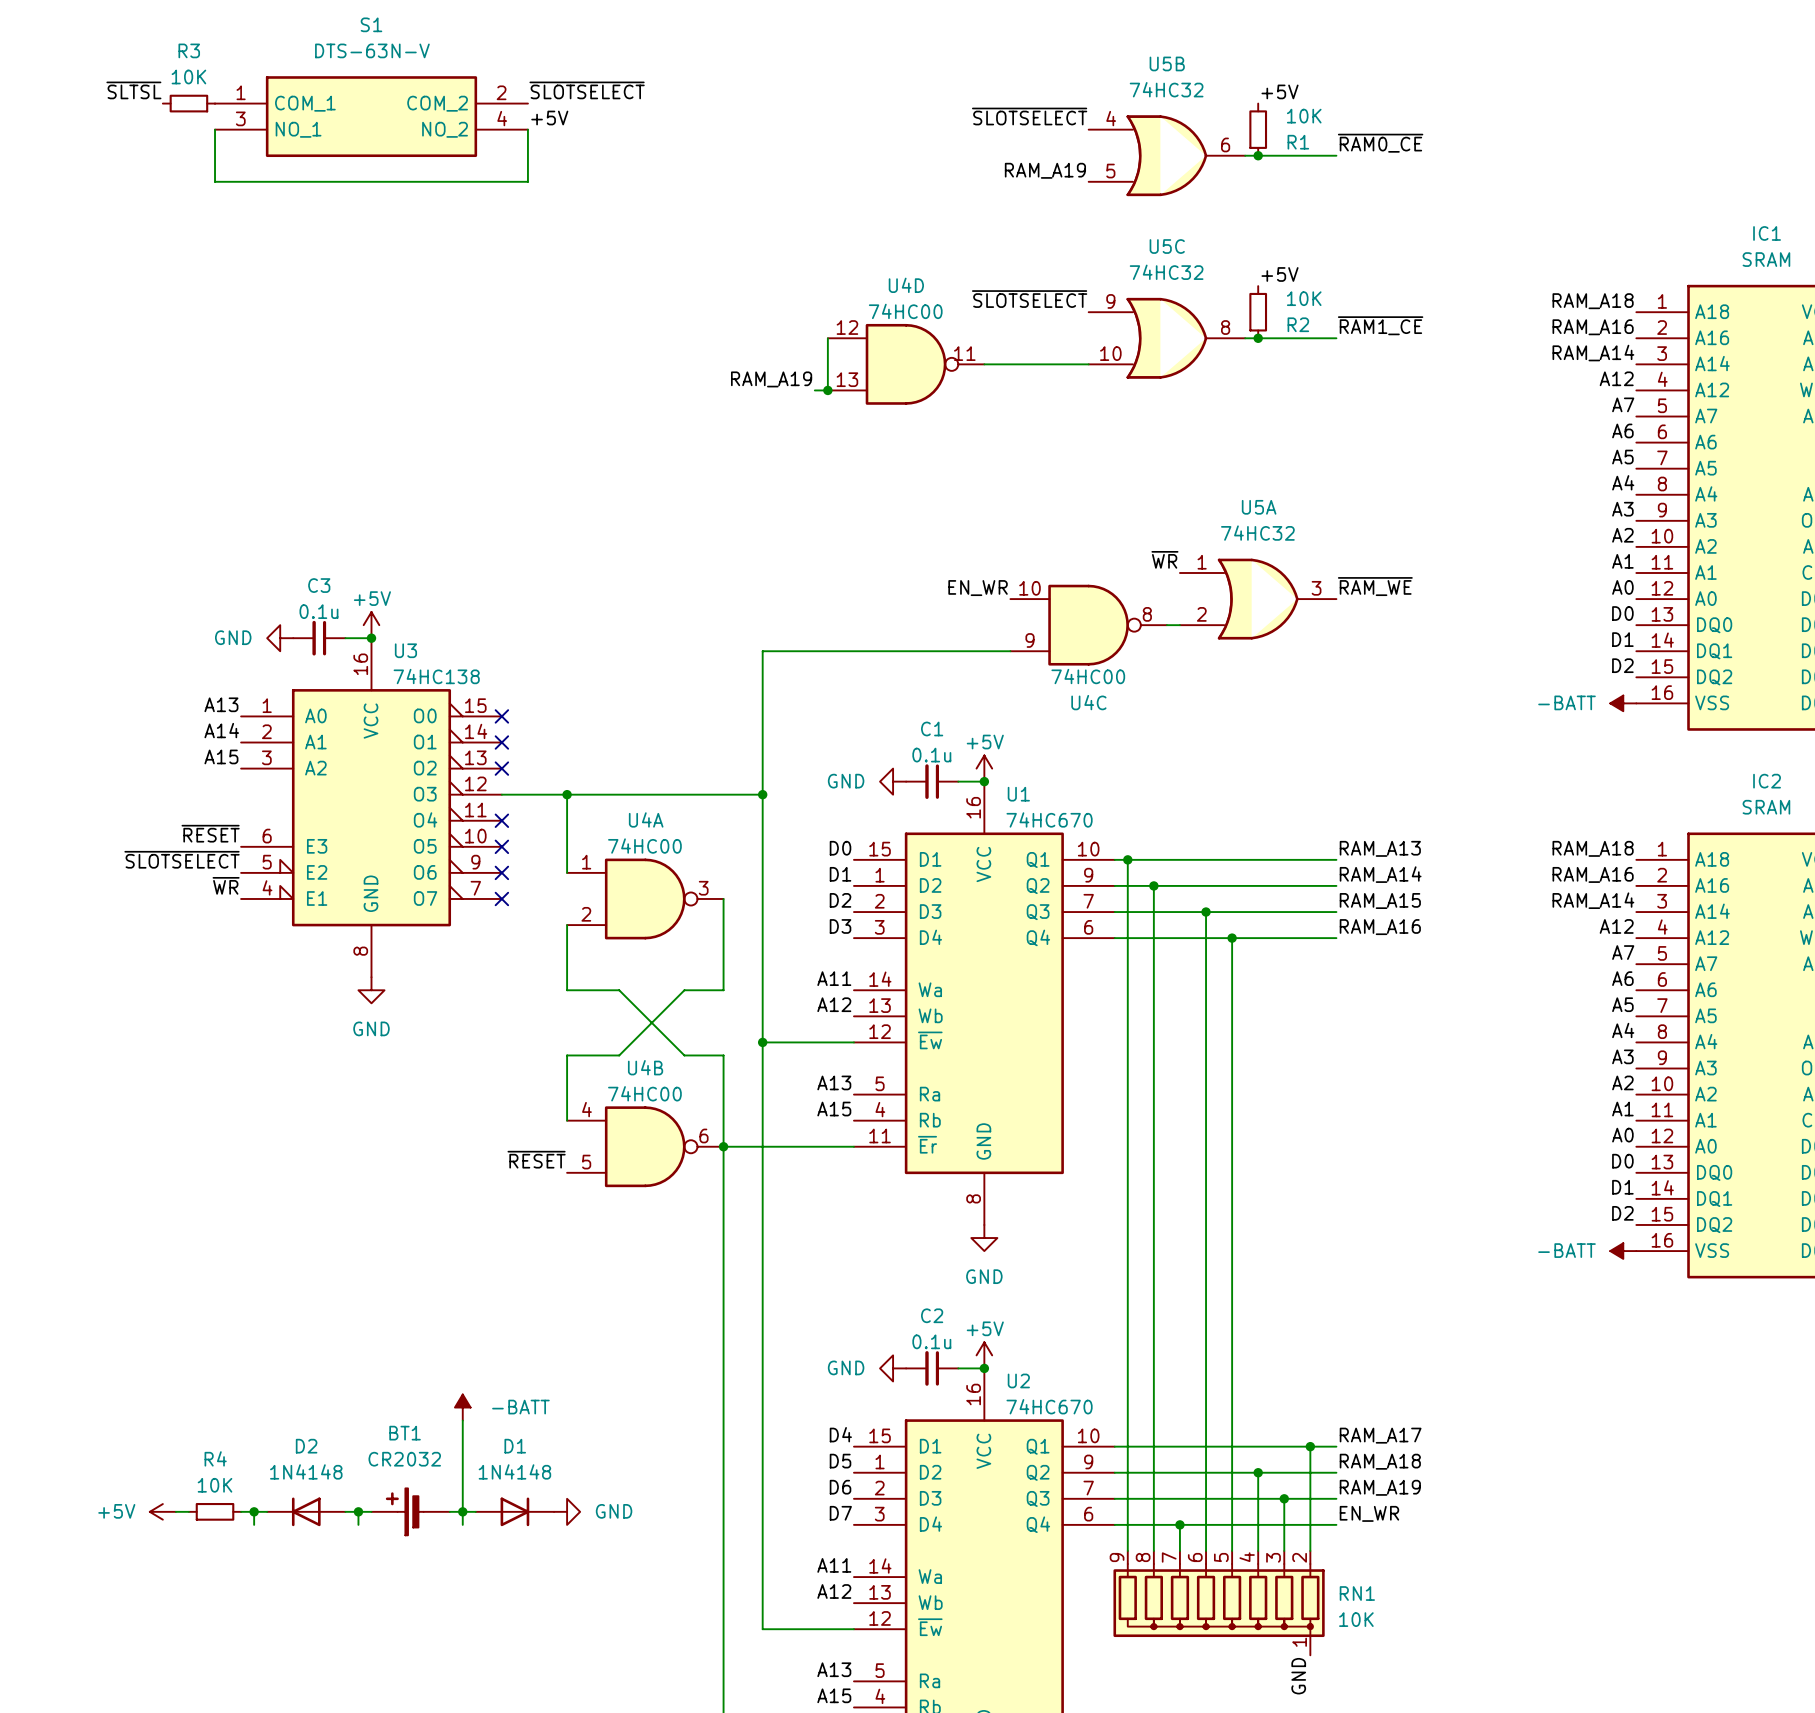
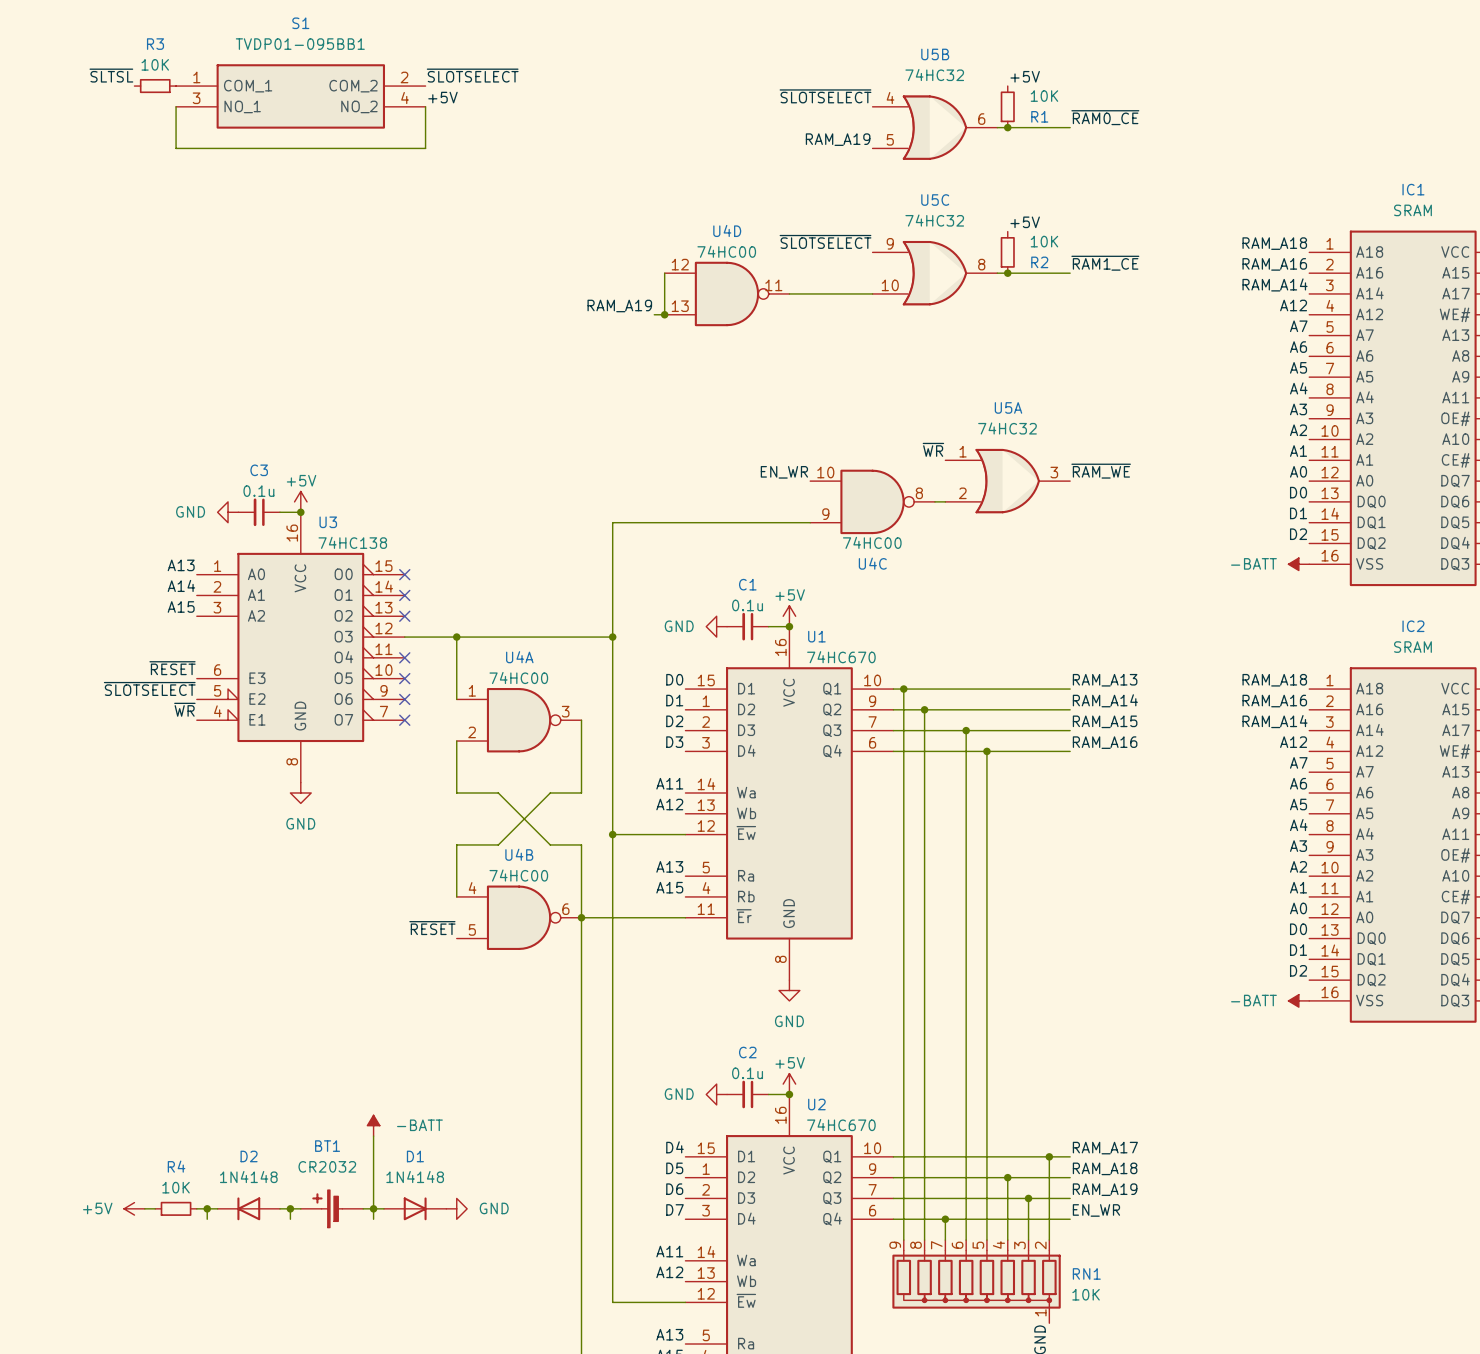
S1 value: DTS-63N-V (372, 50) -> TVDP01-095BB1 (300, 44)

